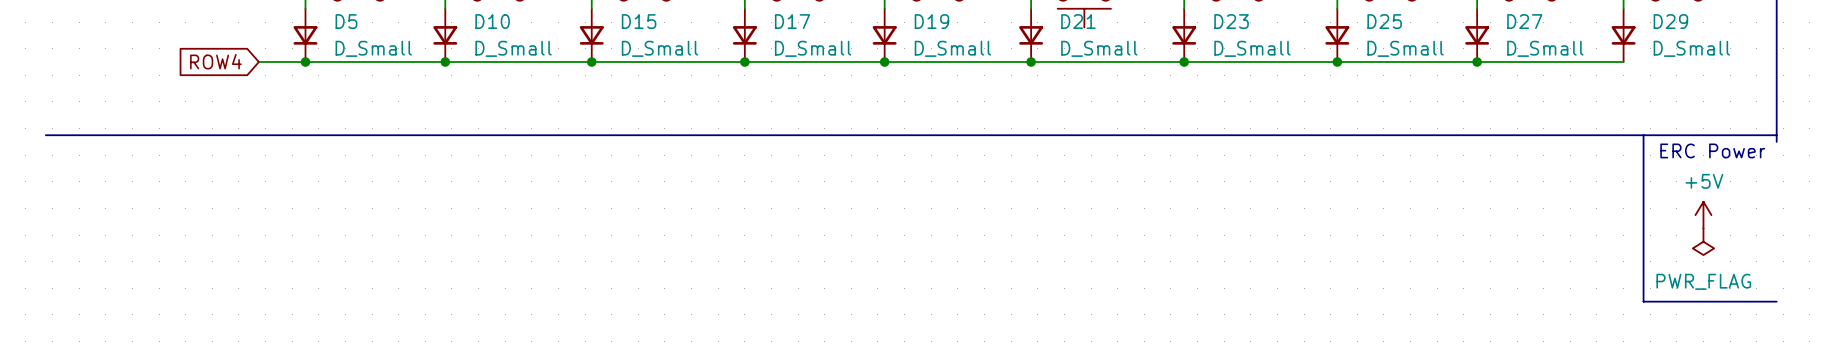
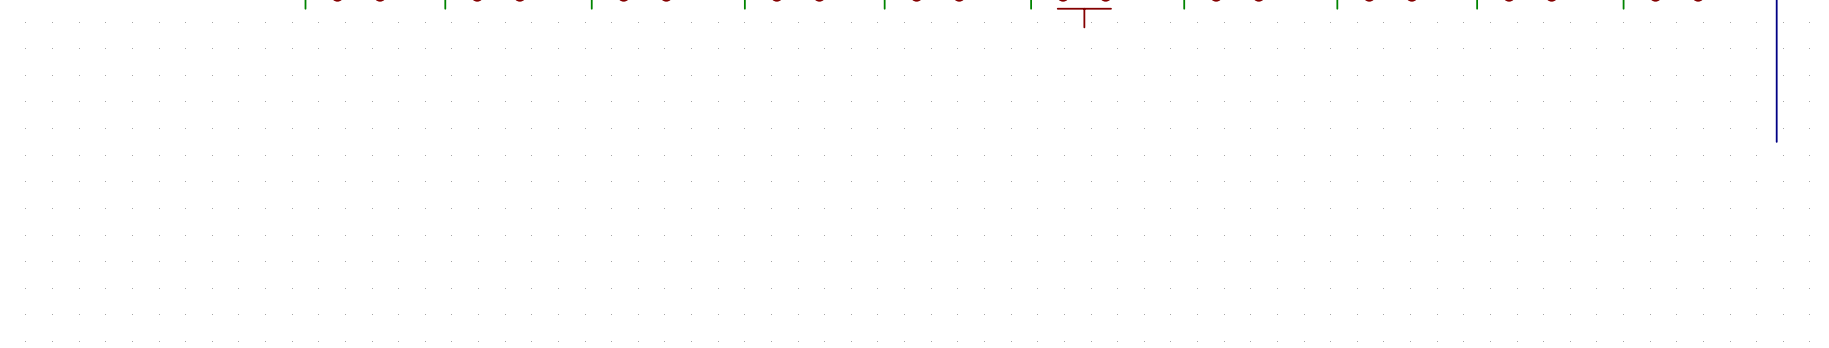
D5: D_Small (305, 35) -> none
D10: D_Small (445, 35) -> none
D15: D_Small (591, 35) -> none
D17: D_Small (744, 35) -> none
D19: D_Small (884, 35) -> none
D21: D_Small (1031, 35) -> none
D23: D_Small (1184, 35) -> none
D25: D_Small (1337, 35) -> none
D27: D_Small (1477, 35) -> none
D29: D_Small (1623, 35) -> none
global label: ROW4 (215, 61) -> none
wire: (258, 62) (1623, 62) -> none
junction: (305, 62) -> none
junction: (445, 62) -> none
junction: (591, 62) -> none
junction: (744, 62) -> none
junction: (884, 62) -> none
junction: (1031, 62) -> none
junction: (1184, 62) -> none
junction: (1337, 62) -> none
junction: (1477, 62) -> none
line: (45, 135) (1776, 135) -> none
line: (1643, 135) (1643, 301) (1776, 301) -> none
text: ERC Power (1712, 150) -> none
power symbol: +5V (1703, 215) -> none
power symbol: PWR_FLAG (1703, 241) -> none

